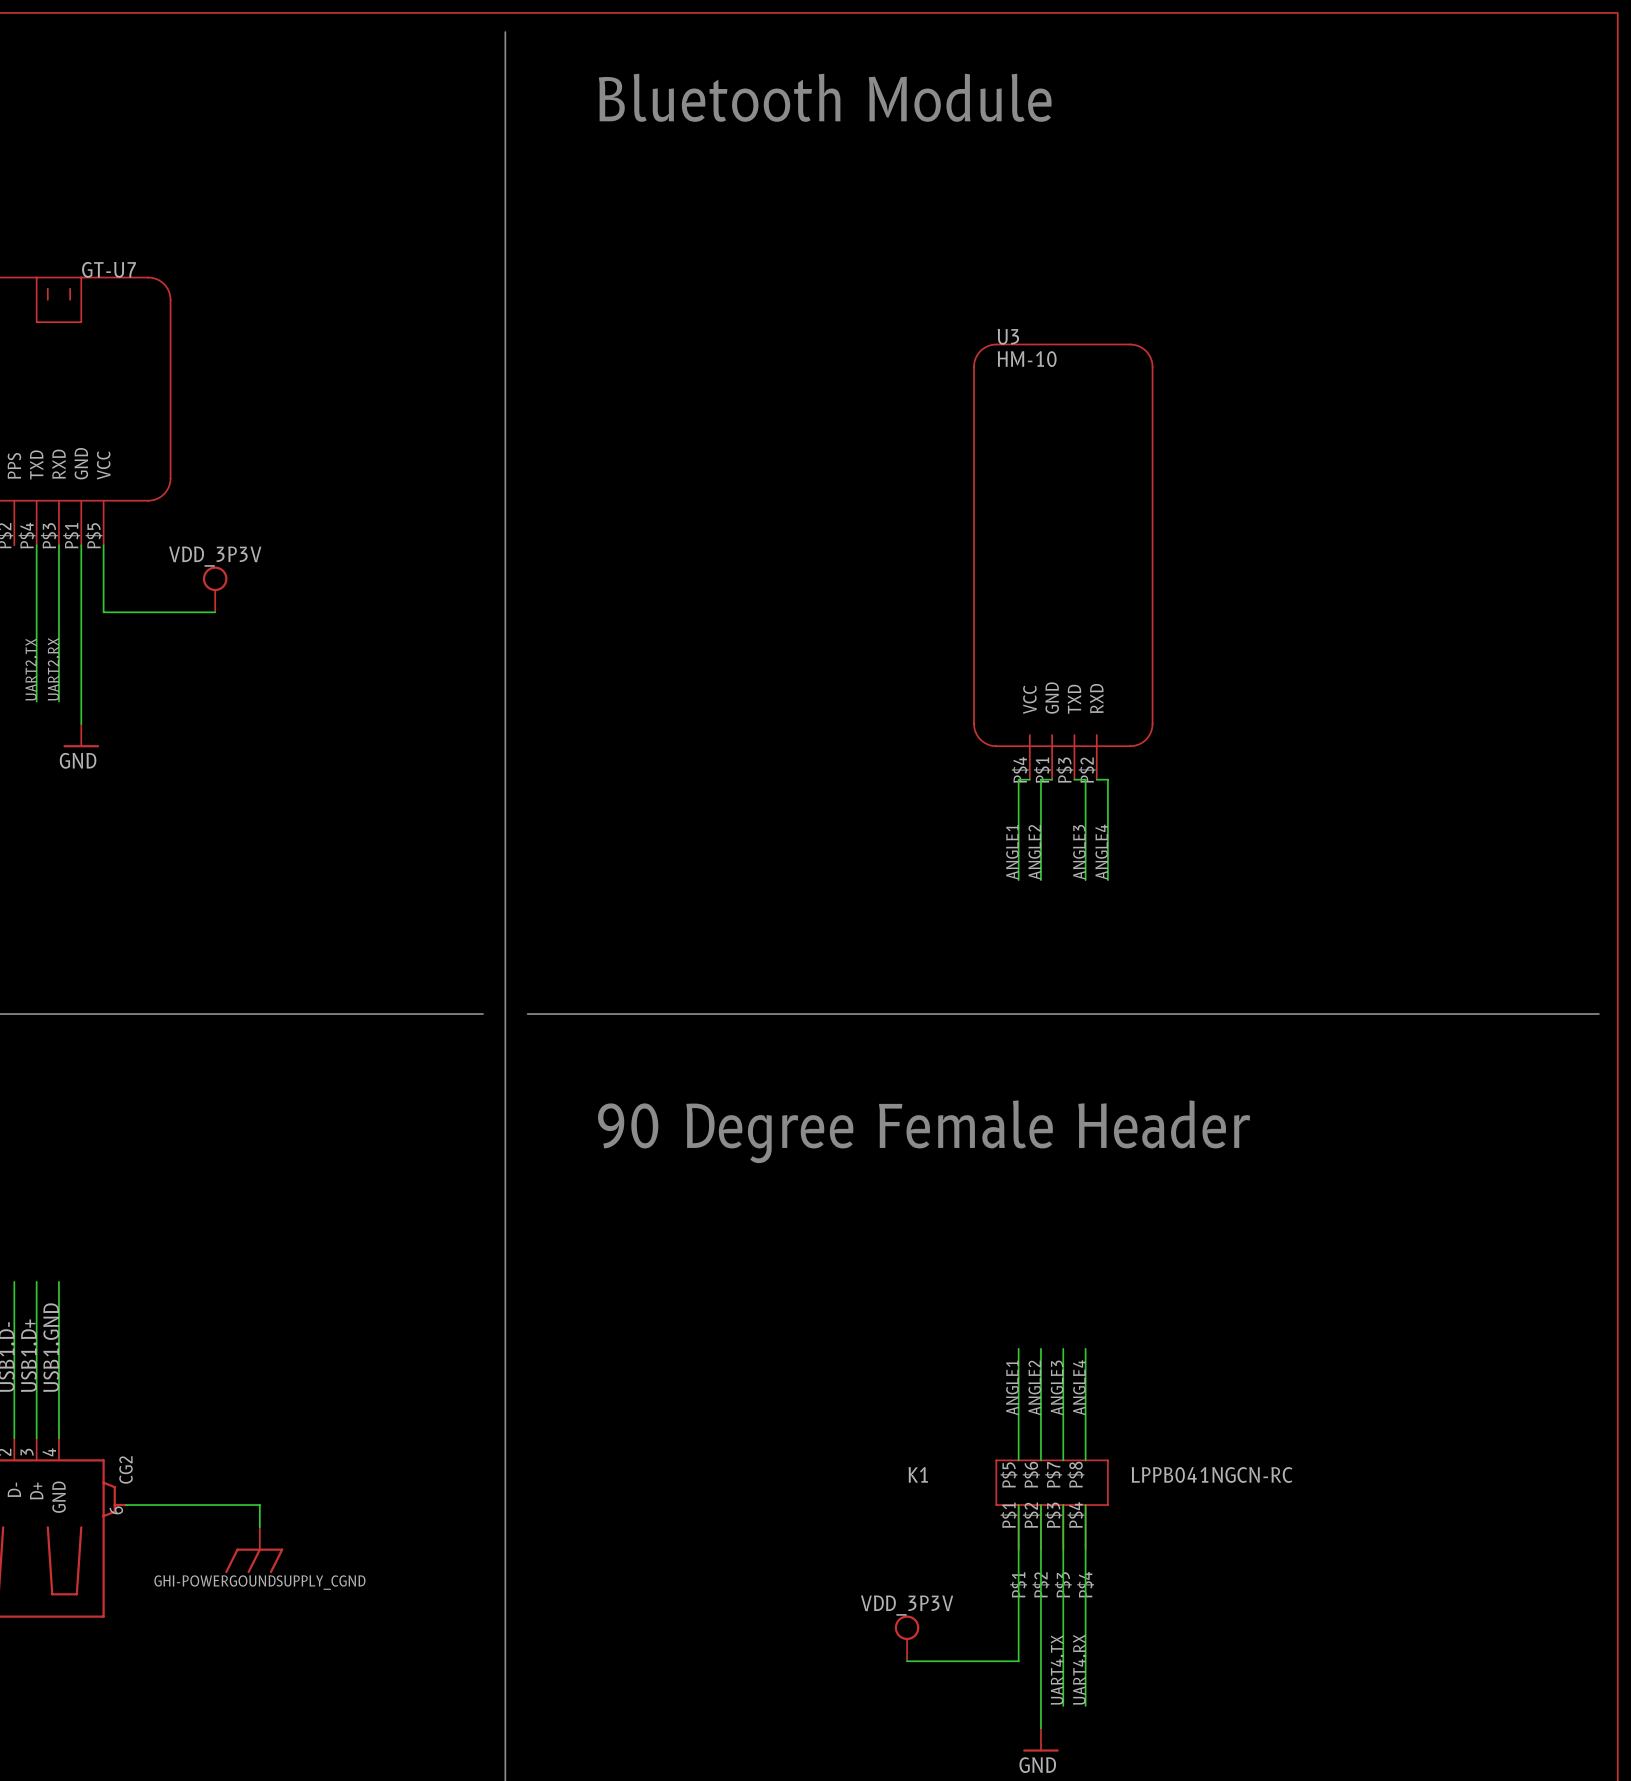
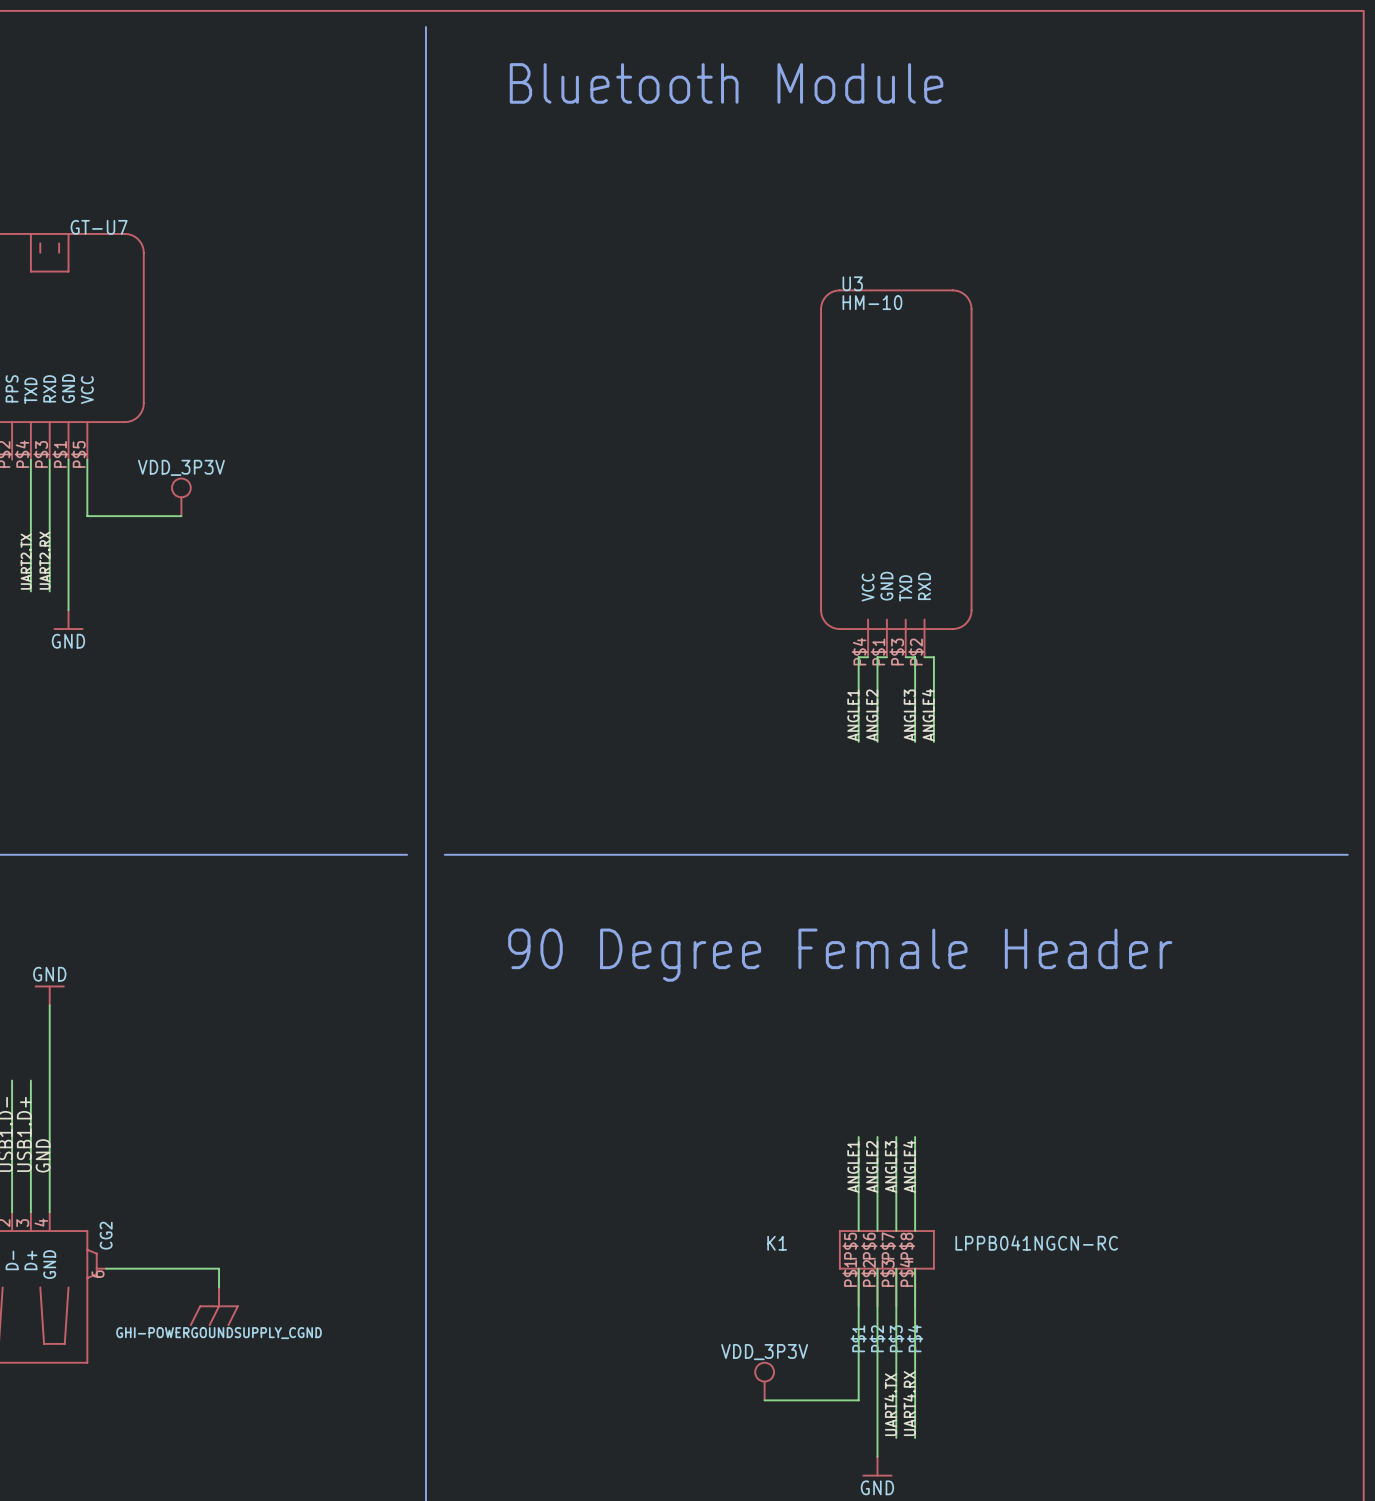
power symbol: none -> GND (49, 995)
wire: none -> (49, 1005) (49, 1080)
label: USB1.GND (51, 1347) -> GND (43, 1155)

